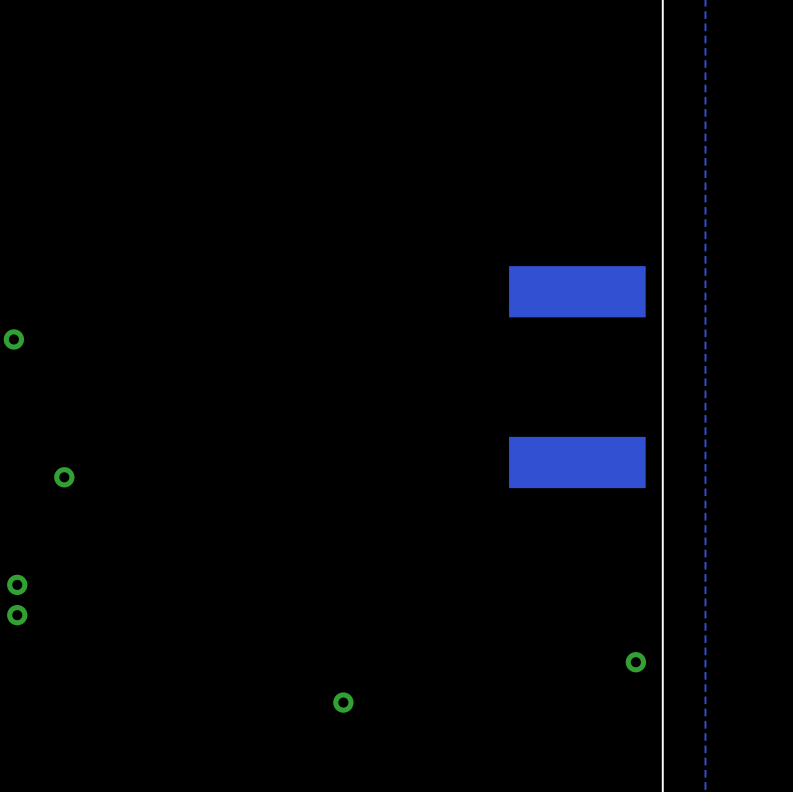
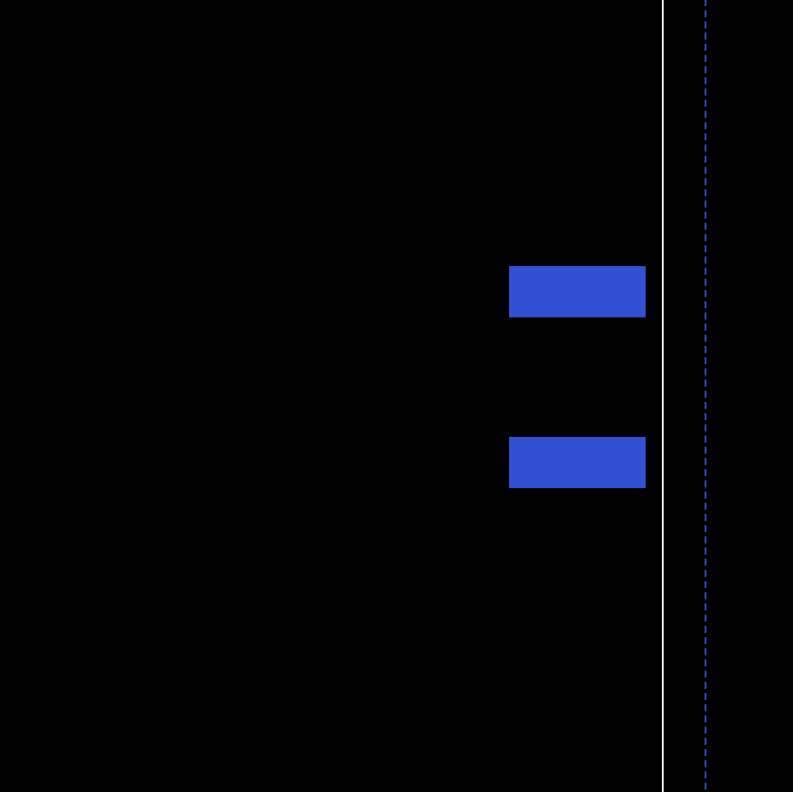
via: (13, 339) -> none
via: (64, 477) -> none
via: (17, 584) -> none
via: (17, 615) -> none
via: (635, 662) -> none
via: (343, 702) -> none

